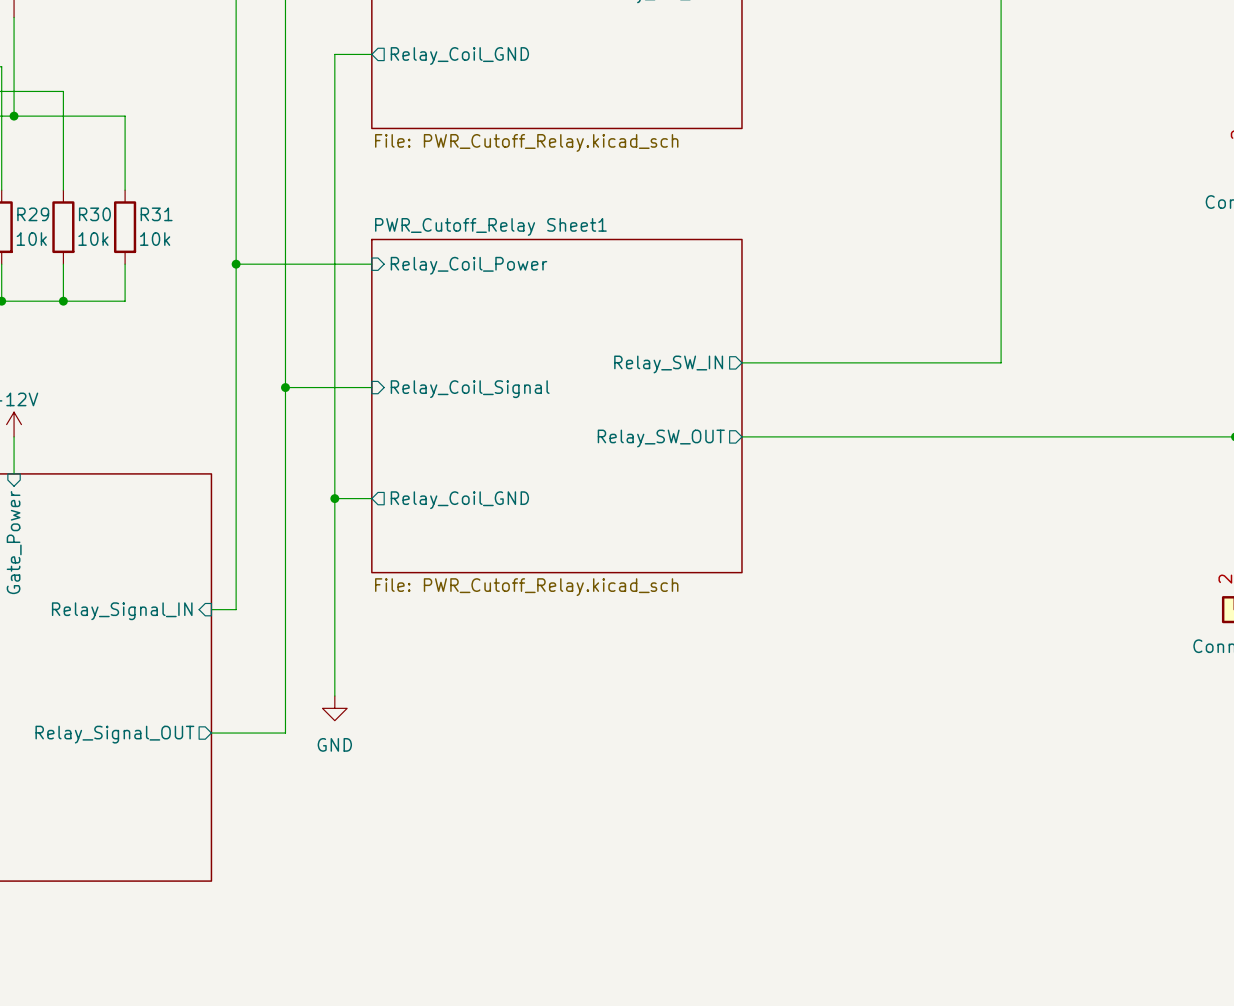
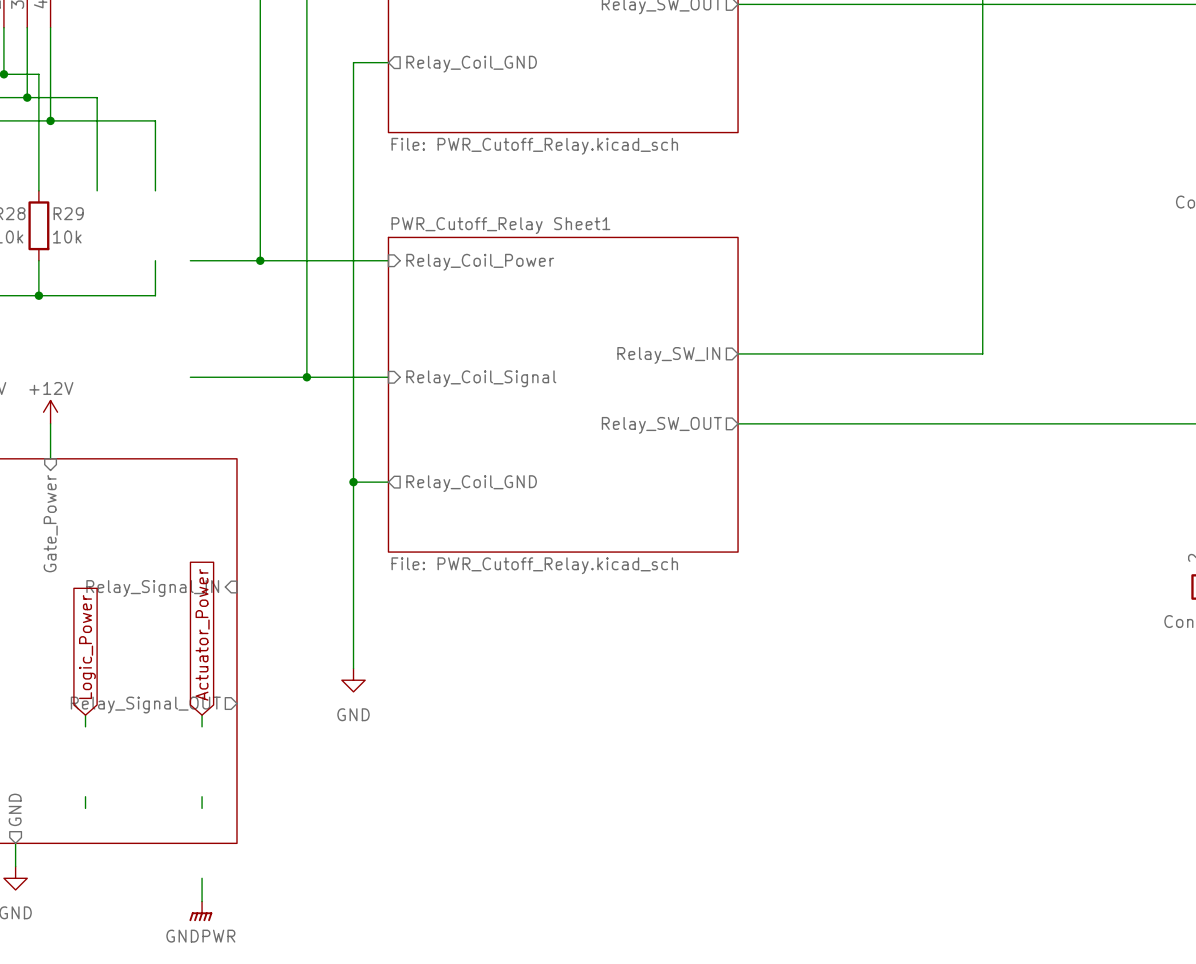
R30: 10k (63, 227) -> none
R31: 10k (125, 227) -> none
wire: (63, 264) (63, 301) -> none
wire: (236, 264) (236, 609) (211, 609) -> (260, 260) (190, 260)
junction: (63, 301) -> none
wire: (285, 387) (285, 733) (211, 733) -> (306, 377) (190, 377)
global label: none -> Actuator_Power (202, 634)
global label: none -> Logic_Power (87, 647)
wire: none -> (85, 715) (85, 726)
wire: none -> (202, 715) (202, 726)
wire: none -> (85, 796) (85, 808)
wire: none -> (202, 796) (202, 808)
wire: none -> (202, 878) (202, 901)
power symbol: none -> GNDPWR (200, 911)

